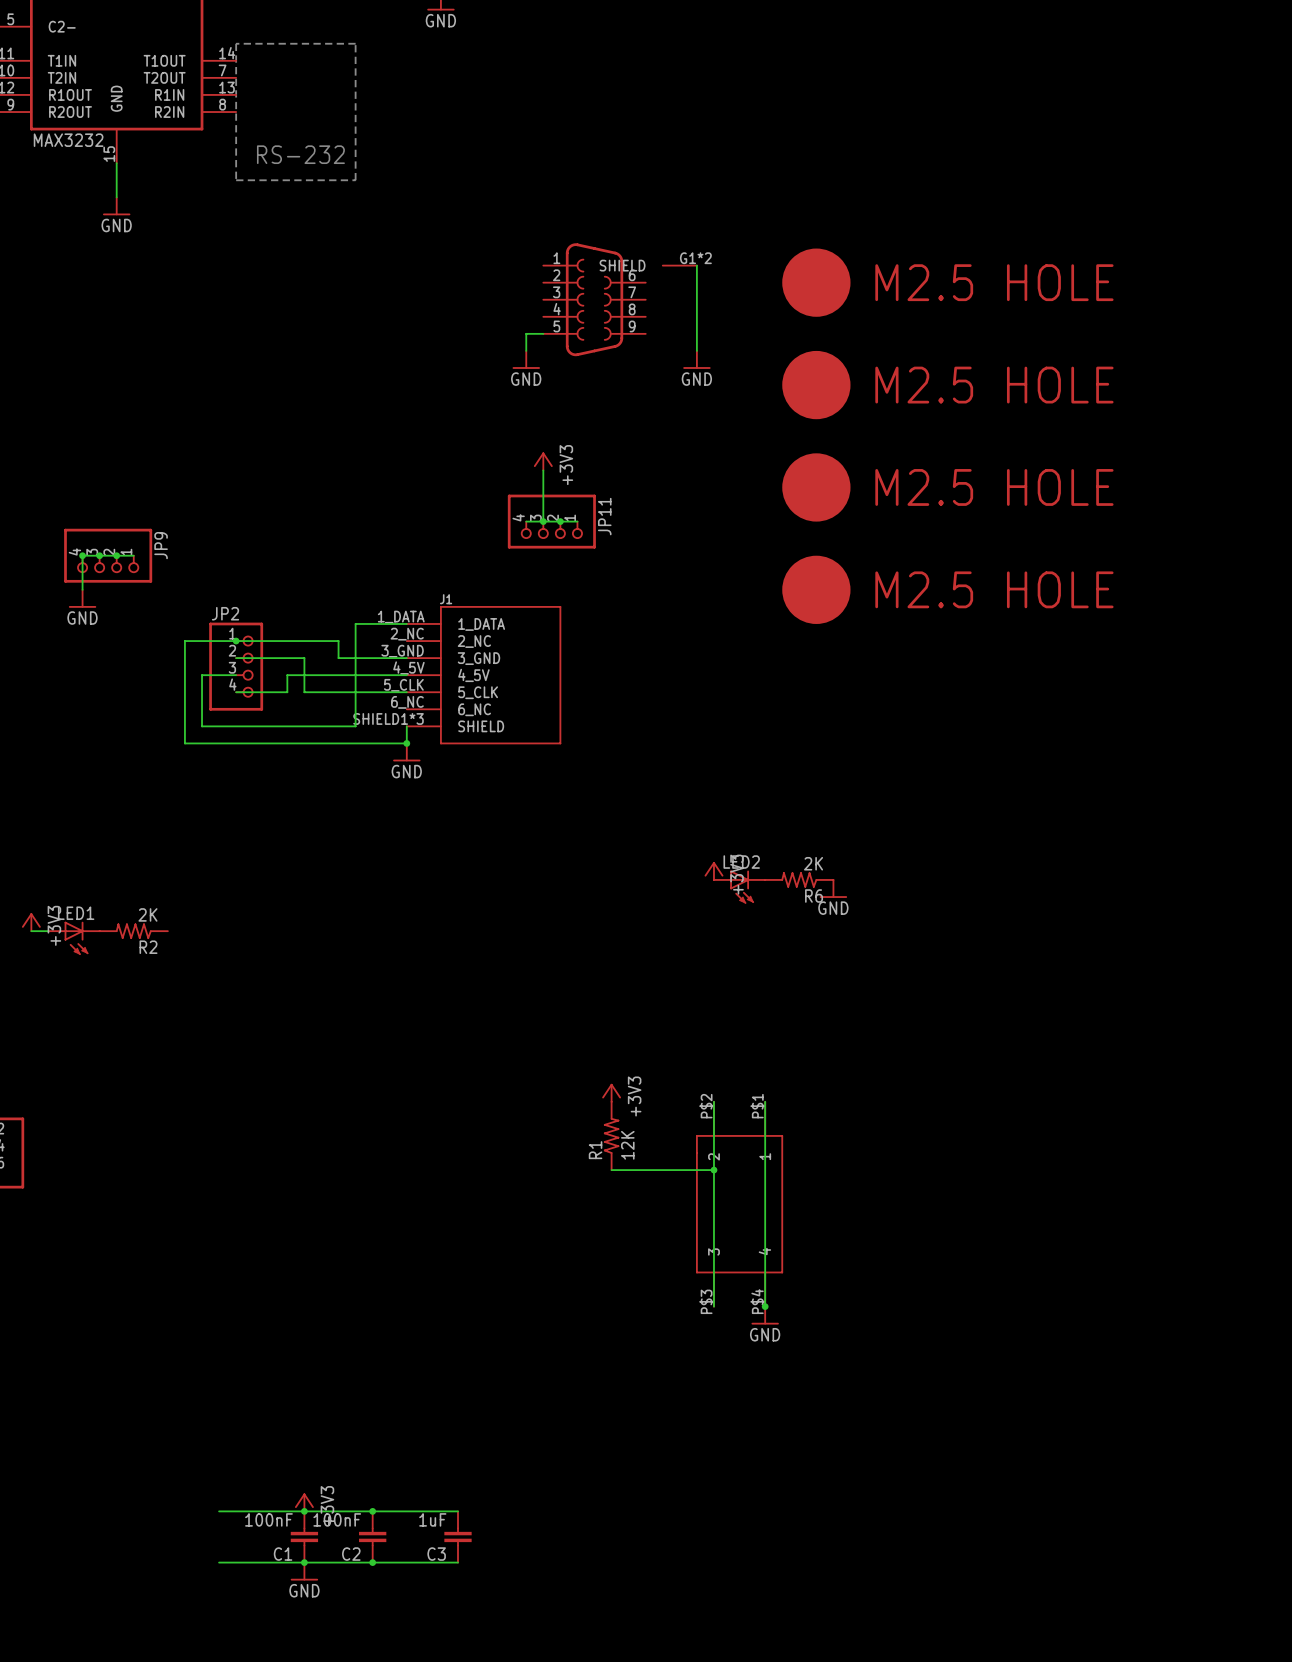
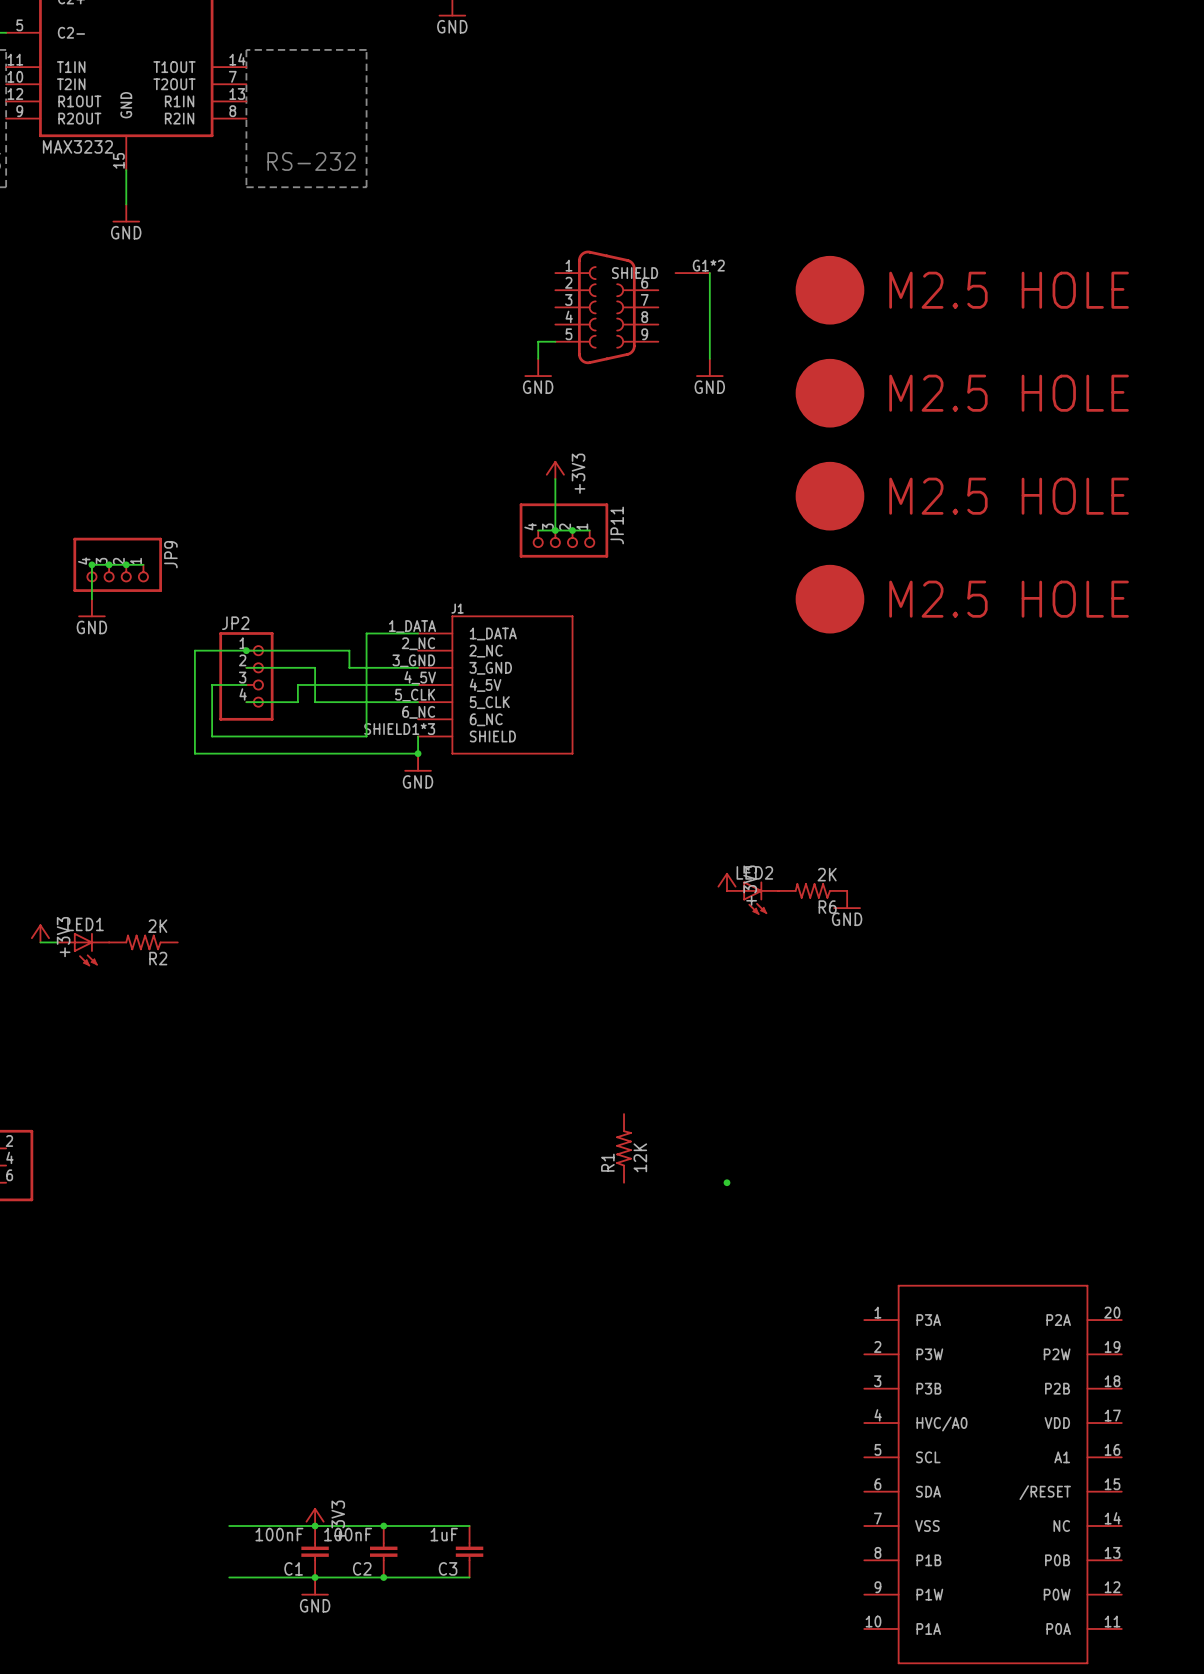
power symbol: +3V3 (611, 1092) -> none
wire: (713, 1101) (713, 1306) -> none
wire: (765, 1101) (765, 1306) -> none
wire: (611, 1170) (713, 1170) -> none
part: (739, 1204) -> none
junction: (765, 1306) -> none
power symbol: GND (765, 1315) -> none
part: none -> (993, 1474)

